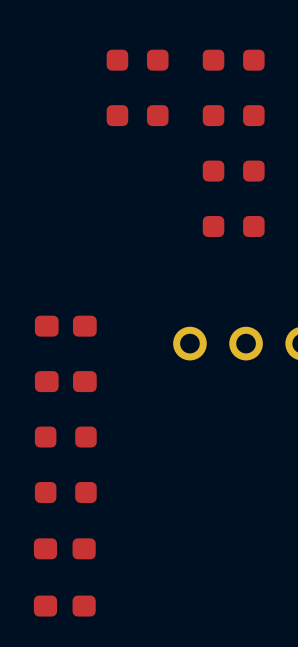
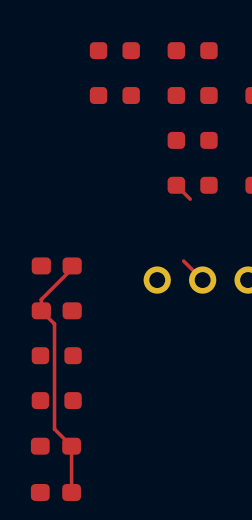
top track: none -> (176, 185) (190, 199)
top track: none -> (77, 261) (72, 268) (41, 299) (41, 310) (54, 324) (54, 429) (71, 446) (71, 492)
top track: none -> (183, 261) (202, 280)

